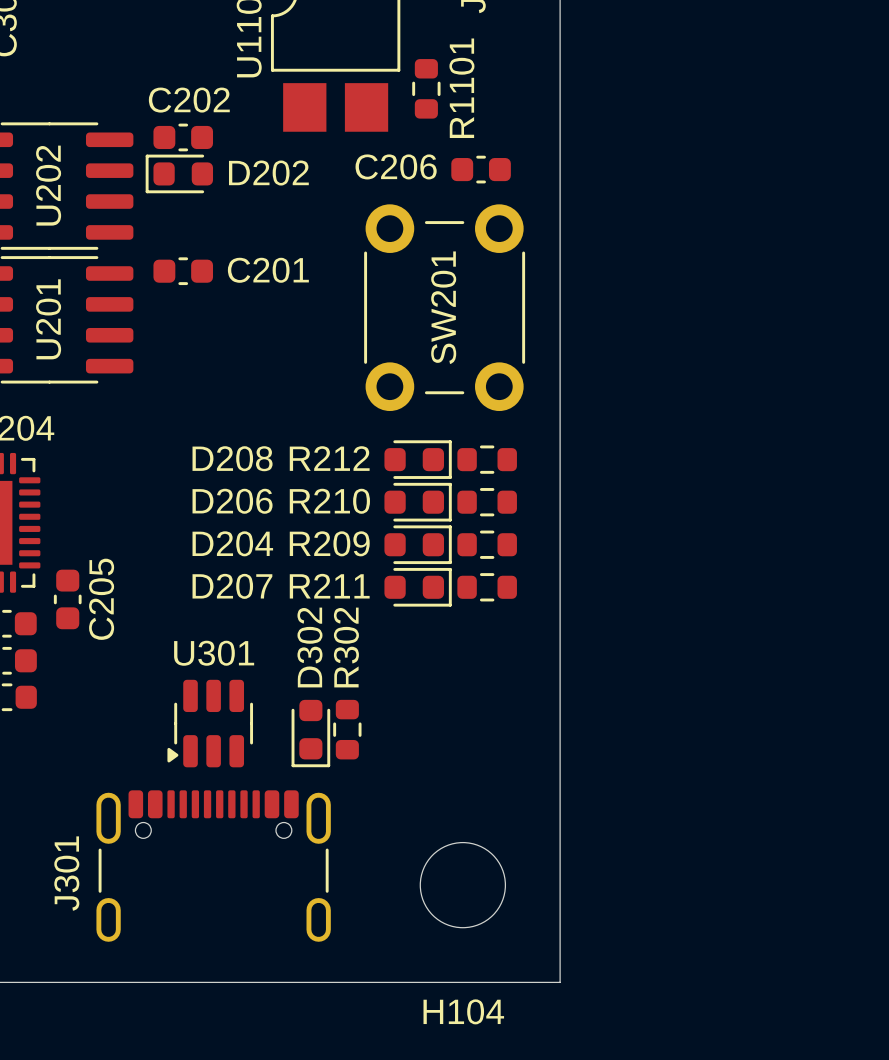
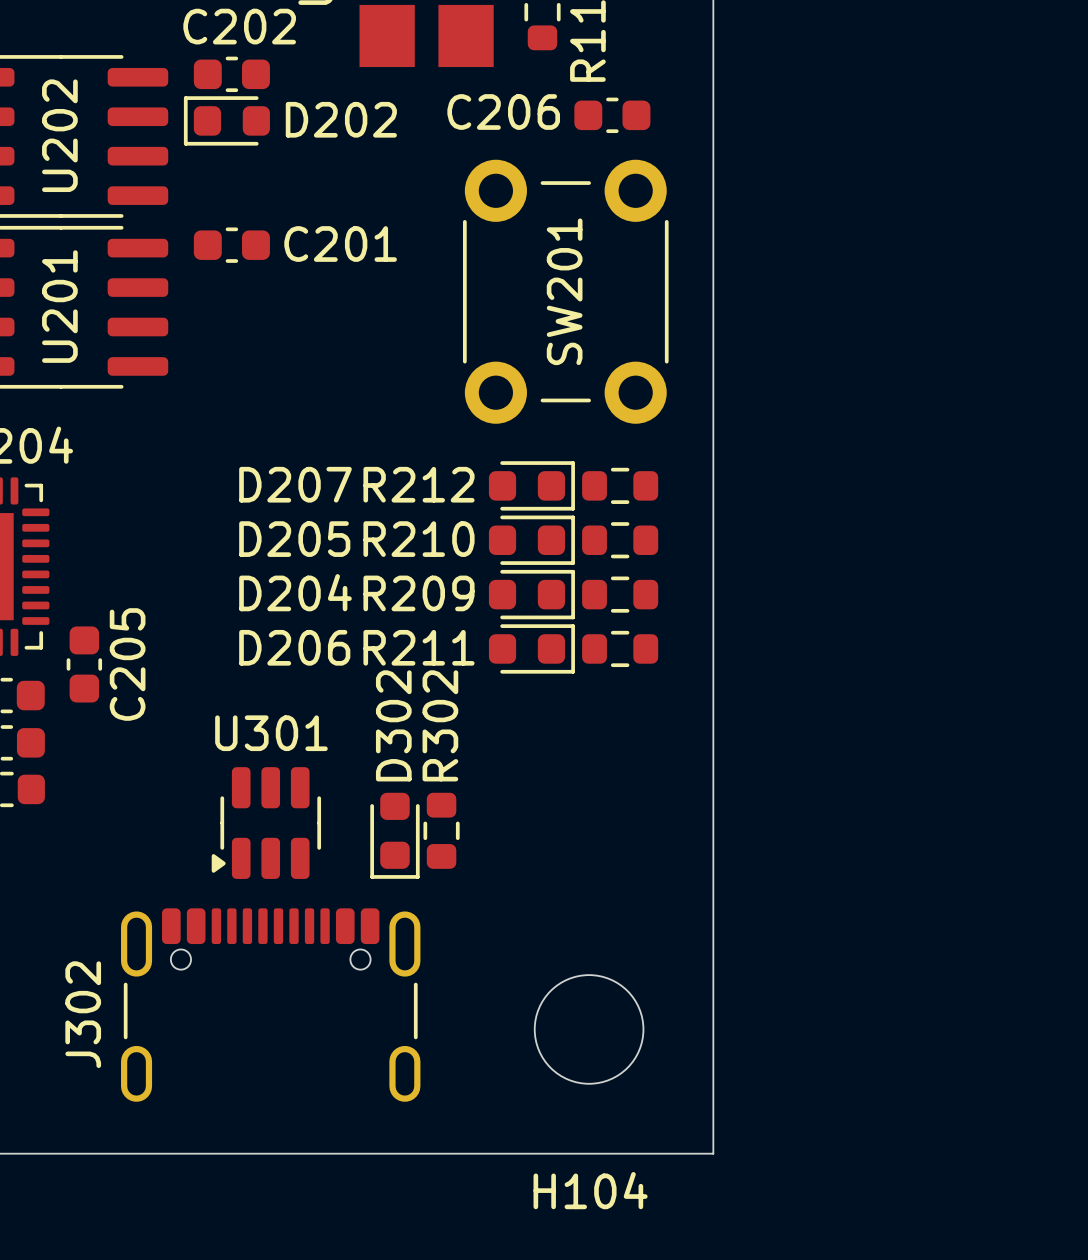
D208 name: D208 (232, 458) -> D207 (295, 484)
D206 name: D206 (232, 501) -> D205 (294, 539)
D207 name: D207 (232, 586) -> D206 (294, 647)
J301 name: J301 (66, 873) -> J302 (83, 1014)

